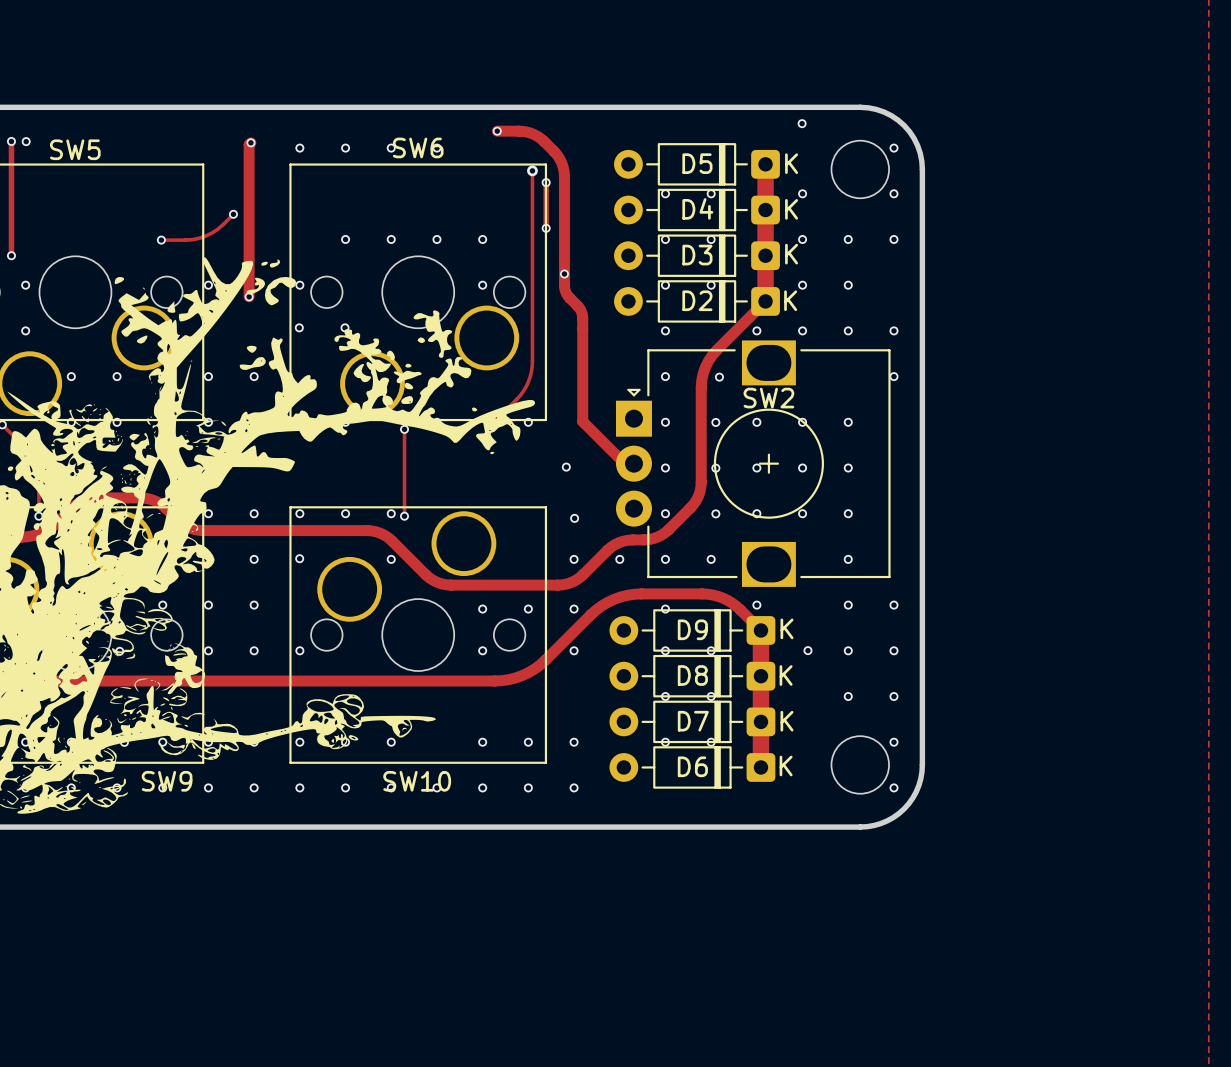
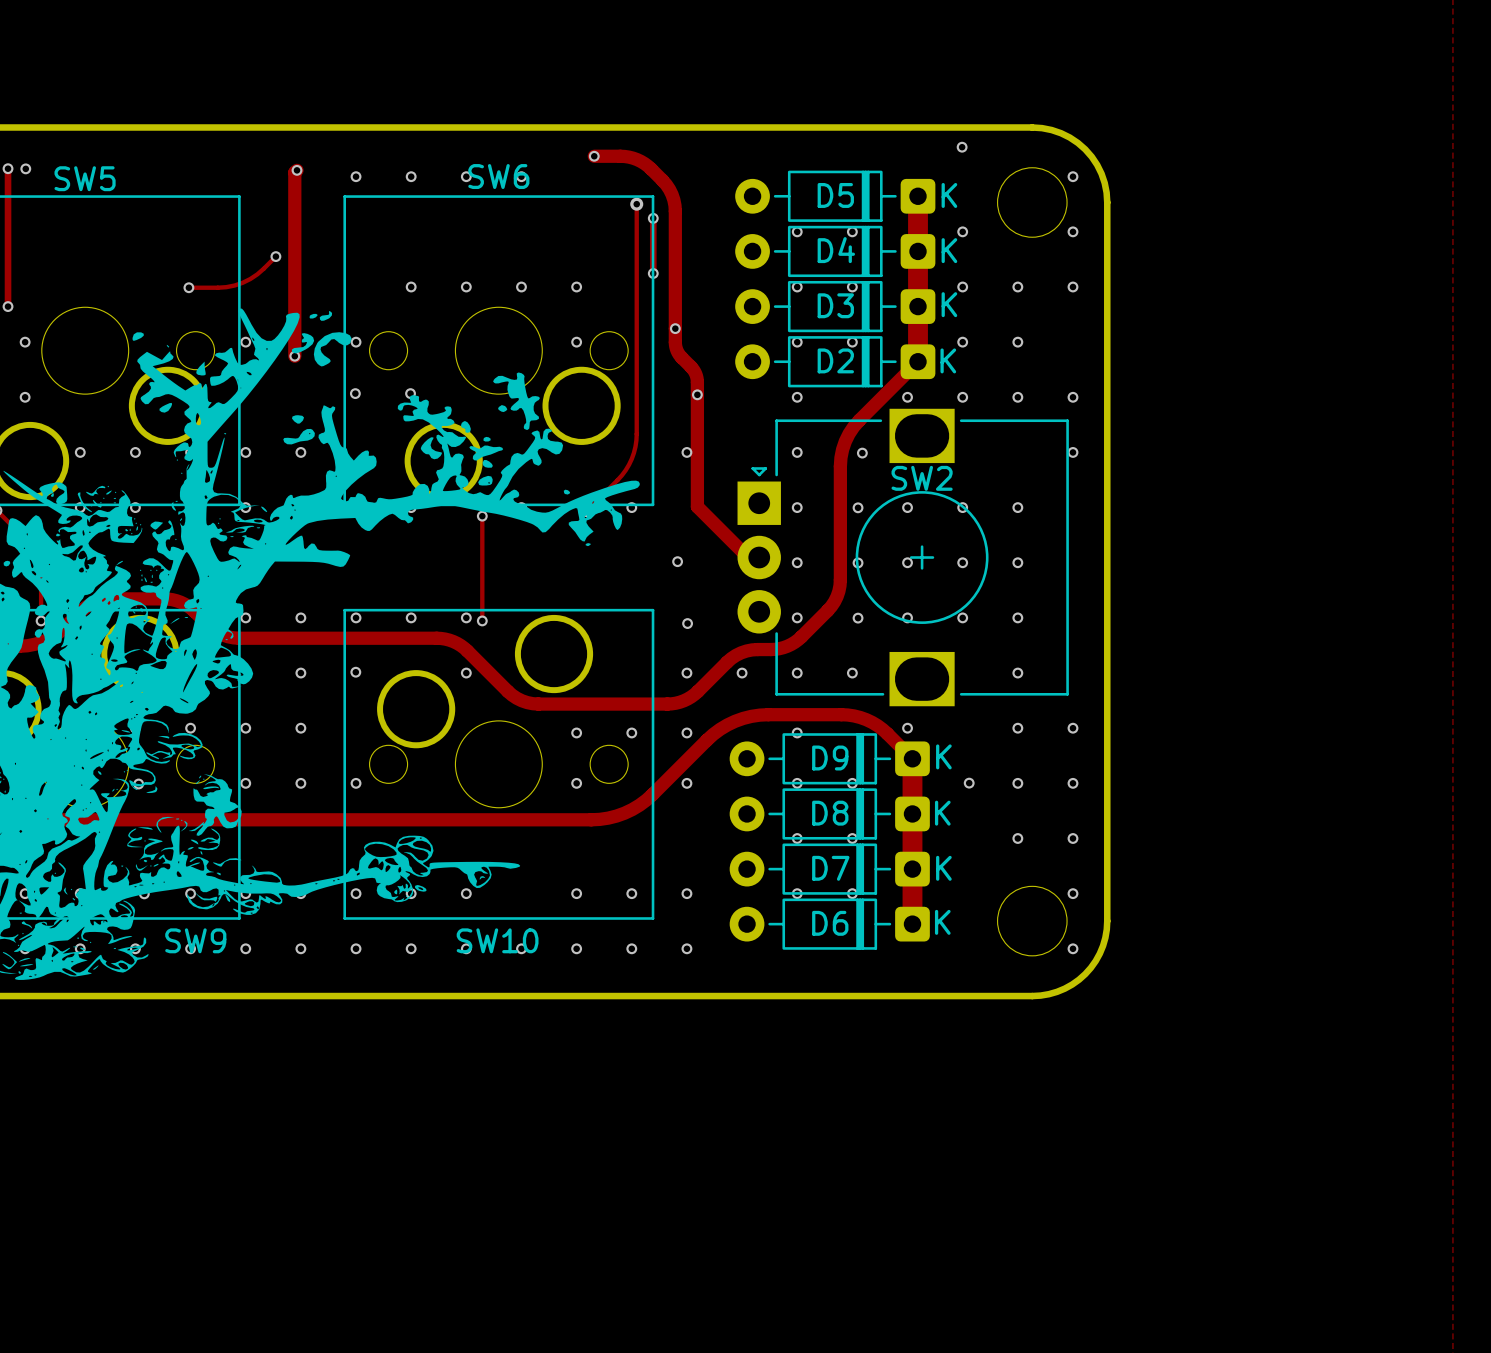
via: none -> (697, 394)
via: none -> (686, 452)

